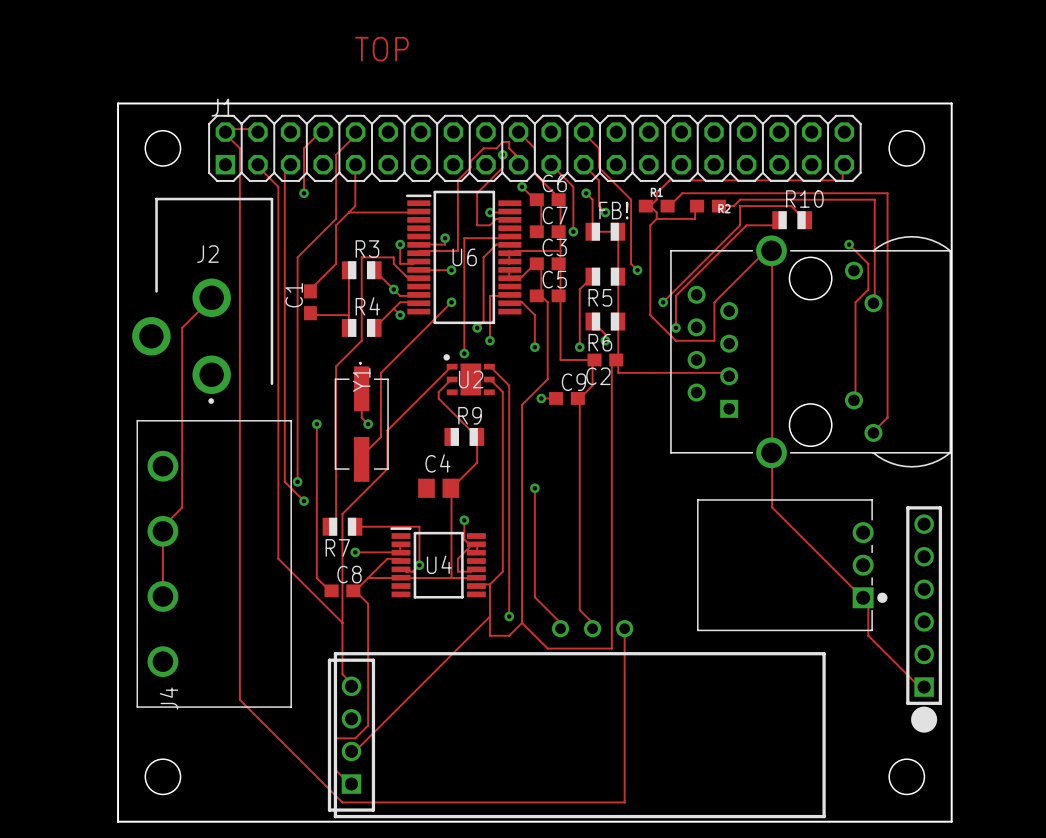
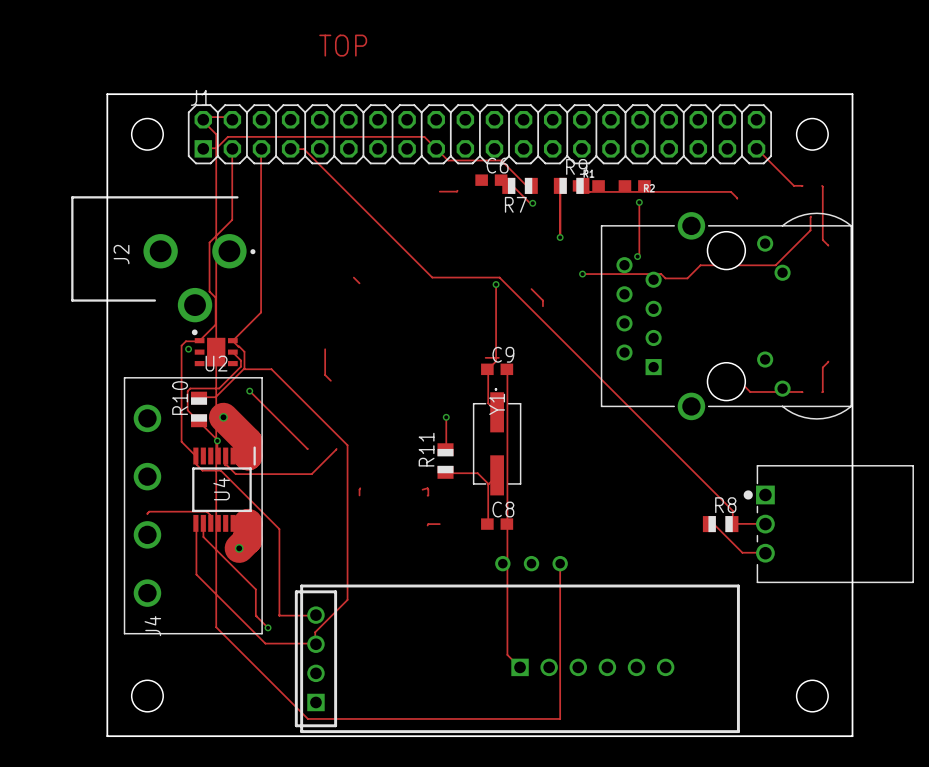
track: (323, 132) (304, 148) (304, 193) -> none
track: (355, 132) (355, 135) (336, 154) (336, 218) (297, 257) (297, 481) -> none
track: (518, 132) (534, 148) (534, 174) (554, 193) (554, 199) (560, 199) (560, 360) (594, 360) -> none
track: (583, 132) (599, 148) (599, 167) (631, 199) (631, 263) (637, 270) -> none
track: (502, 154) (502, 167) (477, 193) (477, 225) (489, 225) (496, 218) (509, 219) -> none
via: (502, 154) -> none
track: none -> (203, 148) (216, 148) (227, 136) (424, 136) (448, 160) (501, 160) (526, 185) (531, 185)
track: (257, 164) (278, 186) (278, 558) (342, 622) -> (232, 148) (232, 219) (209, 242) (209, 291) (215, 297) (215, 324) (199, 341) (185, 341) (181, 345) (181, 441) (196, 456) (196, 464) (202, 470) (220, 470) (279, 529) (279, 615)
track: (290, 164) (284, 167) (284, 481) (304, 501) -> (261, 148) (261, 312) (232, 340) (244, 351) (244, 368) (215, 397) (199, 397)
track: none -> (290, 148) (303, 149) (432, 277) (499, 277) (732, 510) (732, 524) (765, 524)
track: (355, 164) (355, 206) (336, 225) (336, 263) (310, 291) -> none
track: (518, 164) (515, 161) (515, 154) (509, 148) (509, 141) (502, 141) (496, 148) (483, 148) (470, 161) (470, 167) (457, 180) (457, 250) (419, 250) (418, 253) -> none
track: (551, 164) (573, 186) (573, 231) -> none
track: (583, 164) (599, 180) (599, 206) (605, 212) -> none
track: (844, 164) (842, 180) (669, 180) (656, 193) (656, 199) (650, 206) (656, 212) (656, 218) -> (756, 148) (793, 185) (802, 185)
track: (522, 186) (534, 199) (541, 199) (541, 231) (536, 231) -> none
via: (522, 186) -> none
via: (304, 193) -> none
track: (586, 193) (592, 199) (592, 231) (618, 231) (618, 372) (727, 372) (729, 376) -> none
via: (586, 193) -> none
R10 name position: R10 (804, 199) -> R10 (180, 398)
track: none -> (508, 185) (513, 186) (530, 203) (532, 203)
track: none -> (583, 185) (589, 191) (731, 191) (737, 198)
track: (667, 206) (682, 193) (887, 193) (887, 417) (873, 432) -> none
track: (697, 206) (695, 206) (695, 218) (656, 218) -> none
track: (718, 206) (733, 206) (740, 199) (874, 199) (873, 303) -> none
track: none -> (822, 185) (822, 239) (828, 245)
track: (418, 211) (348, 212) -> none
via: (489, 212) -> none
via: (605, 212) -> none
track: (656, 218) (650, 225) (650, 315) (675, 340) (714, 340) (714, 302) (765, 250) (772, 250) (772, 507) (868, 603) (868, 635) (919, 687) (924, 687) -> none
track: (779, 220) (778, 225) (746, 225) (675, 295) (675, 327) -> none
R10 rotation: 0° (792, 220) -> 90° clockwise (199, 409)
R10 position: (792, 220) -> (199, 409)
track: (804, 220) (791, 206) (740, 206) (740, 225) (663, 302) -> none
track: none -> (639, 202) (639, 254) (637, 256)
via: none -> (639, 202)
via: none -> (532, 203)
C7: (547, 231) -> none
via: (573, 231) -> none
FB!: (605, 231) -> none
track: (509, 236) (509, 238) (464, 238) (464, 353) -> none
track: (445, 238) (445, 244) (418, 244) -> none
via: (445, 238) -> none
track: none -> (811, 216) (810, 230) (775, 265) (700, 265) (687, 278) (665, 278) (661, 274) (582, 274)
track: (400, 244) (400, 263) (413, 263) (418, 261) -> none
via: (400, 244) -> none
track: (509, 244) (496, 244) (483, 257) (483, 321) (477, 327) -> none
track: (849, 244) (868, 263) (868, 289) (855, 302) (855, 398) (853, 400) -> none
via: (849, 244) -> none
track: (560, 250) (515, 250) (509, 253) (509, 250) (509, 263) (509, 261) -> none
U6: (463, 257) -> none
C3: (547, 263) -> none
via: none -> (560, 237)
track: (418, 269) (451, 270) -> none
track: (509, 269) (509, 278) (522, 276) (534, 263) (541, 263) (541, 295) -> none
track: (348, 270) (348, 327) -> (560, 185) (560, 237)
R3: (361, 270) -> none
track: (374, 270) (400, 295) (418, 294) -> none
via: (451, 270) -> none
via: (637, 270) -> none
track: (592, 276) (579, 289) (579, 347) -> none
R5: (605, 276) -> none
track: (418, 278) (406, 276) (393, 263) (393, 257) (361, 257) (361, 340) (336, 366) (336, 520) (329, 526) -> none
via: none -> (637, 256)
via: (393, 289) -> none
track: (509, 294) (489, 295) (489, 340) -> none
track: (541, 295) (547, 302) (547, 379) (522, 404) (522, 622) -> none
C5: (547, 295) -> none
track: (211, 297) (182, 327) (182, 507) (162, 526) (162, 596) -> none
J2 rotation: 0° (202, 300) -> 90° counterclockwise (163, 259)
C1: (310, 302) -> none
track: (451, 302) (380, 372) (380, 436) (361, 456) (361, 459) -> none
via: (451, 302) -> none
via: (663, 302) -> none
track: (418, 303) (400, 302) (374, 327) -> none
track: (509, 303) (522, 302) (534, 315) (534, 347) -> none
via: none -> (582, 274)
track: (310, 313) (310, 315) (348, 315) -> none
via: (400, 315) -> none
track: none -> (496, 284) (496, 361) (487, 369) (488, 403) (497, 412)
via: none -> (496, 284)
R6: (605, 321) -> none
R4: (361, 327) -> none
via: (477, 327) -> none
via: (675, 327) -> none
via: (489, 340) -> none
via: (605, 340) -> none
via: (534, 347) -> none
via: (579, 347) -> none
via: (464, 353) -> none
track: (592, 360) (592, 385) (579, 398) -> none
C2: (605, 360) -> none
track: (618, 360) (611, 360) (611, 648) (547, 648) (522, 622) -> none
track: (452, 366) (387, 430) (387, 469) (342, 513) (342, 674) (351, 686) -> (279, 615) (315, 615)
track: (489, 366) (509, 385) (509, 616) -> none
U2 position: (469, 374) -> (214, 347)
track: (452, 379) (438, 392) (438, 398) (477, 436) (477, 462) (451, 488) -> none
U2 name position: U2 (471, 379) -> U2 (216, 363)
track: (489, 379) (502, 392) (502, 571) (489, 584) (489, 635) (509, 635) (522, 622) -> none
via: none -> (188, 349)
track: none -> (232, 352) (240, 360) (240, 366) (219, 388) (190, 388) (187, 391) (187, 410) (217, 440) (218, 456)
via: (541, 398) -> none
C9 position: (566, 398) -> (497, 369)
track: (579, 398) (579, 610) (592, 622) (592, 628) -> none
track: none -> (828, 361) (822, 367) (822, 392)
track: none -> (244, 368) (271, 369) (347, 445) (347, 599) (315, 632) (315, 644) (265, 643) (196, 574) (195, 523)
track: none -> (506, 369) (507, 654) (520, 667)
Y1 position: (361, 421) -> (497, 441)
track: none -> (737, 379) (750, 391) (802, 392)
track: (316, 424) (316, 578) (331, 590) -> none
via: (316, 424) -> none
via: (368, 424) -> none
track: none -> (249, 391) (307, 449)
via: none -> (249, 391)
R9 position: (464, 436) -> (571, 185)
track: none -> (223, 417) (247, 441) (248, 456)
via: none -> (223, 417)
track: none -> (446, 417) (445, 449)
via: none -> (446, 417)
via: (297, 481) -> none
C4: (438, 488) -> none
track: (451, 488) (451, 578) -> none
track: (534, 488) (534, 597) (560, 622) (560, 628) -> none
via: (534, 488) -> none
via: none -> (217, 440)
track: none -> (336, 449) (311, 474) (235, 474) (224, 464)
via: (304, 501) -> none
R11: none -> (445, 461)
track: (464, 520) (464, 539) (470, 545) (457, 558) (457, 571) (470, 571) (476, 569) -> none
via: (464, 520) -> none
R7 position: (342, 526) -> (520, 185)
track: (355, 526) (419, 526) (419, 565) (413, 571) (401, 569) -> none
track: none -> (445, 472) (477, 473) (488, 484)
track: none -> (497, 475) (488, 484) (487, 524)
track: (355, 552) (401, 552) -> none
via: (355, 552) -> none
track: (401, 561) (400, 558) (387, 558) (355, 590) -> none
U4 rotation: 0° (438, 562) -> 90° clockwise (223, 489)
U4 position: (438, 562) -> (223, 489)
via: (419, 565) -> none
part rotation: 0° (792, 565) -> 180° (828, 524)
part position: (792, 565) -> (828, 524)
track: none -> (147, 514) (149, 511) (206, 511) (210, 515) (210, 523)
track: (476, 577) (368, 578) -> none
track: none -> (203, 523) (203, 537) (255, 589) (255, 615) (268, 627)
track: none -> (248, 523) (247, 539) (239, 548)
track: none -> (709, 524) (714, 524) (742, 552) (765, 553)
R8: none -> (720, 524)
C8 position: (342, 590) -> (497, 524)
track: (355, 590) (368, 603) (368, 725) (355, 738) (336, 738) (336, 770) (351, 784) -> none
via: none -> (239, 548)
track: (489, 616) (355, 751) (351, 751) -> none
via: (509, 616) -> none
part side: top (924, 619) -> bottom (592, 667)
via: none -> (268, 627)

